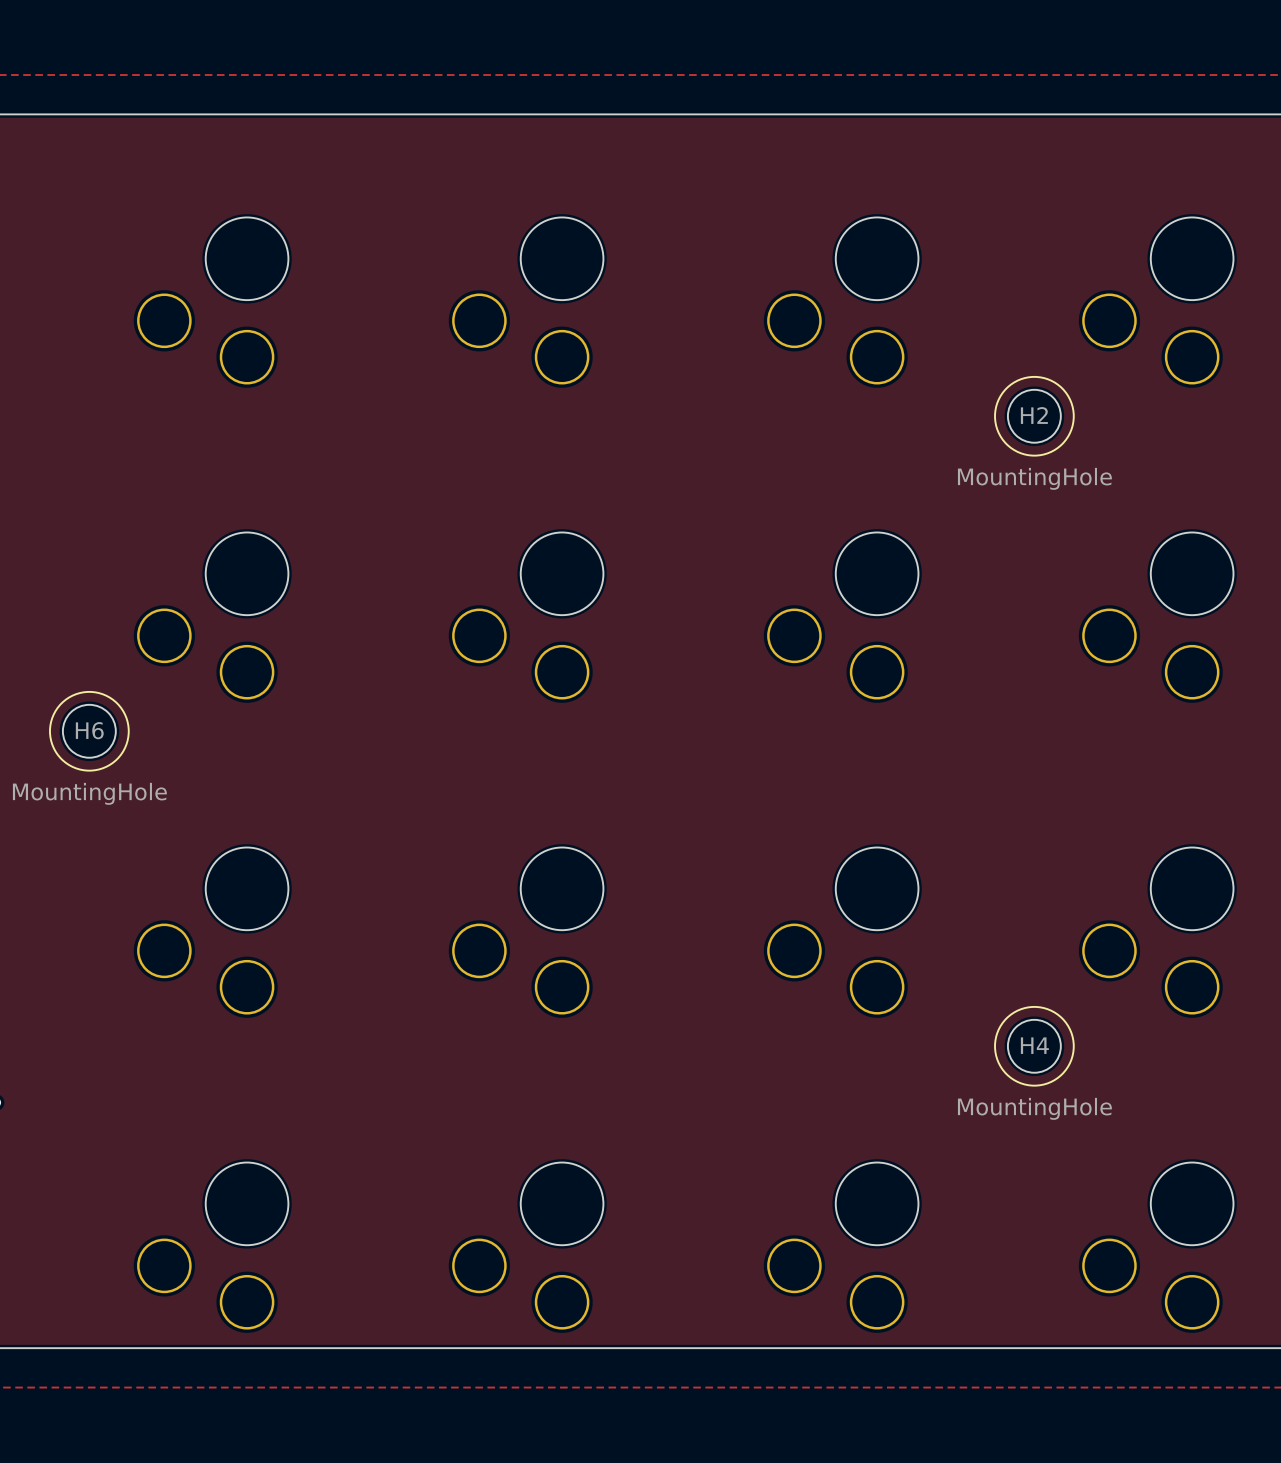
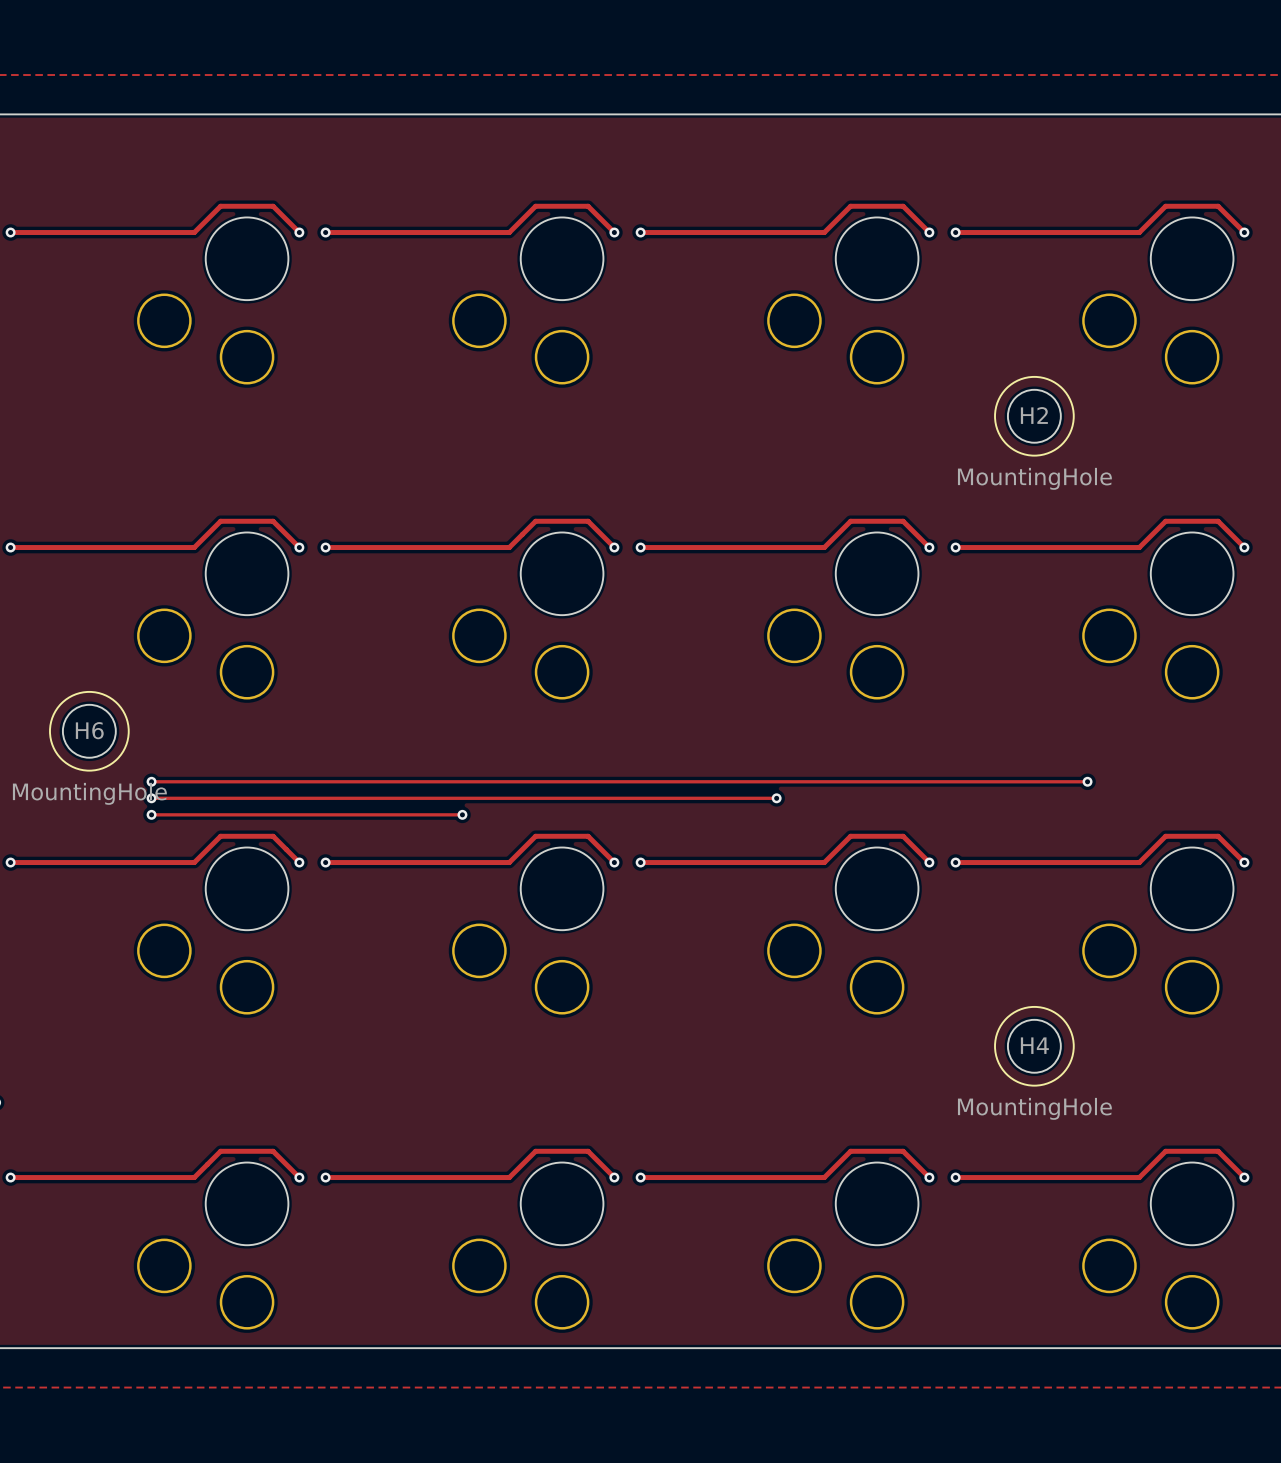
track: none -> (10, 232) (194, 232) (220, 206) (273, 206) (299, 232)
via: none -> (10, 232)
via: none -> (299, 232)
track: none -> (325, 232) (509, 232) (535, 206) (588, 206) (614, 232)
via: none -> (325, 232)
via: none -> (614, 232)
track: none -> (640, 232) (824, 232) (850, 206) (903, 206) (929, 232)
via: none -> (640, 232)
via: none -> (929, 232)
track: none -> (955, 232) (1139, 232) (1165, 206) (1218, 206) (1244, 232)
via: none -> (955, 232)
via: none -> (1244, 232)
track: none -> (10, 547) (194, 547) (220, 521) (273, 521) (299, 547)
via: none -> (10, 547)
via: none -> (299, 547)
track: none -> (325, 547) (509, 547) (535, 521) (588, 521) (614, 547)
via: none -> (325, 547)
via: none -> (614, 547)
track: none -> (640, 547) (824, 547) (850, 521) (903, 521) (929, 547)
via: none -> (640, 547)
via: none -> (929, 547)
track: none -> (955, 547) (1139, 547) (1165, 521) (1218, 521) (1244, 547)
via: none -> (955, 547)
via: none -> (1244, 547)
track: none -> (151, 781) (1087, 781)
via: none -> (151, 781)
via: none -> (1087, 781)
track: none -> (151, 798) (776, 798)
via: none -> (151, 798)
via: none -> (776, 798)
track: none -> (151, 814) (462, 814)
via: none -> (151, 814)
via: none -> (462, 814)
track: none -> (10, 862) (194, 862) (220, 836) (273, 836) (299, 862)
via: none -> (10, 862)
via: none -> (299, 862)
track: none -> (325, 862) (509, 862) (535, 836) (588, 836) (614, 862)
via: none -> (325, 862)
via: none -> (614, 862)
track: none -> (640, 862) (824, 862) (850, 836) (903, 836) (929, 862)
via: none -> (640, 862)
via: none -> (929, 862)
track: none -> (955, 862) (1139, 862) (1165, 836) (1218, 836) (1244, 862)
via: none -> (955, 862)
via: none -> (1244, 862)
track: none -> (10, 1177) (194, 1177) (220, 1151) (273, 1151) (299, 1177)
via: none -> (10, 1177)
via: none -> (299, 1177)
track: none -> (325, 1177) (509, 1177) (535, 1151) (588, 1151) (614, 1177)
via: none -> (325, 1177)
via: none -> (614, 1177)
track: none -> (640, 1177) (824, 1177) (850, 1151) (903, 1151) (929, 1177)
via: none -> (640, 1177)
via: none -> (929, 1177)
track: none -> (955, 1177) (1139, 1177) (1165, 1151) (1218, 1151) (1244, 1177)
via: none -> (955, 1177)
via: none -> (1244, 1177)

